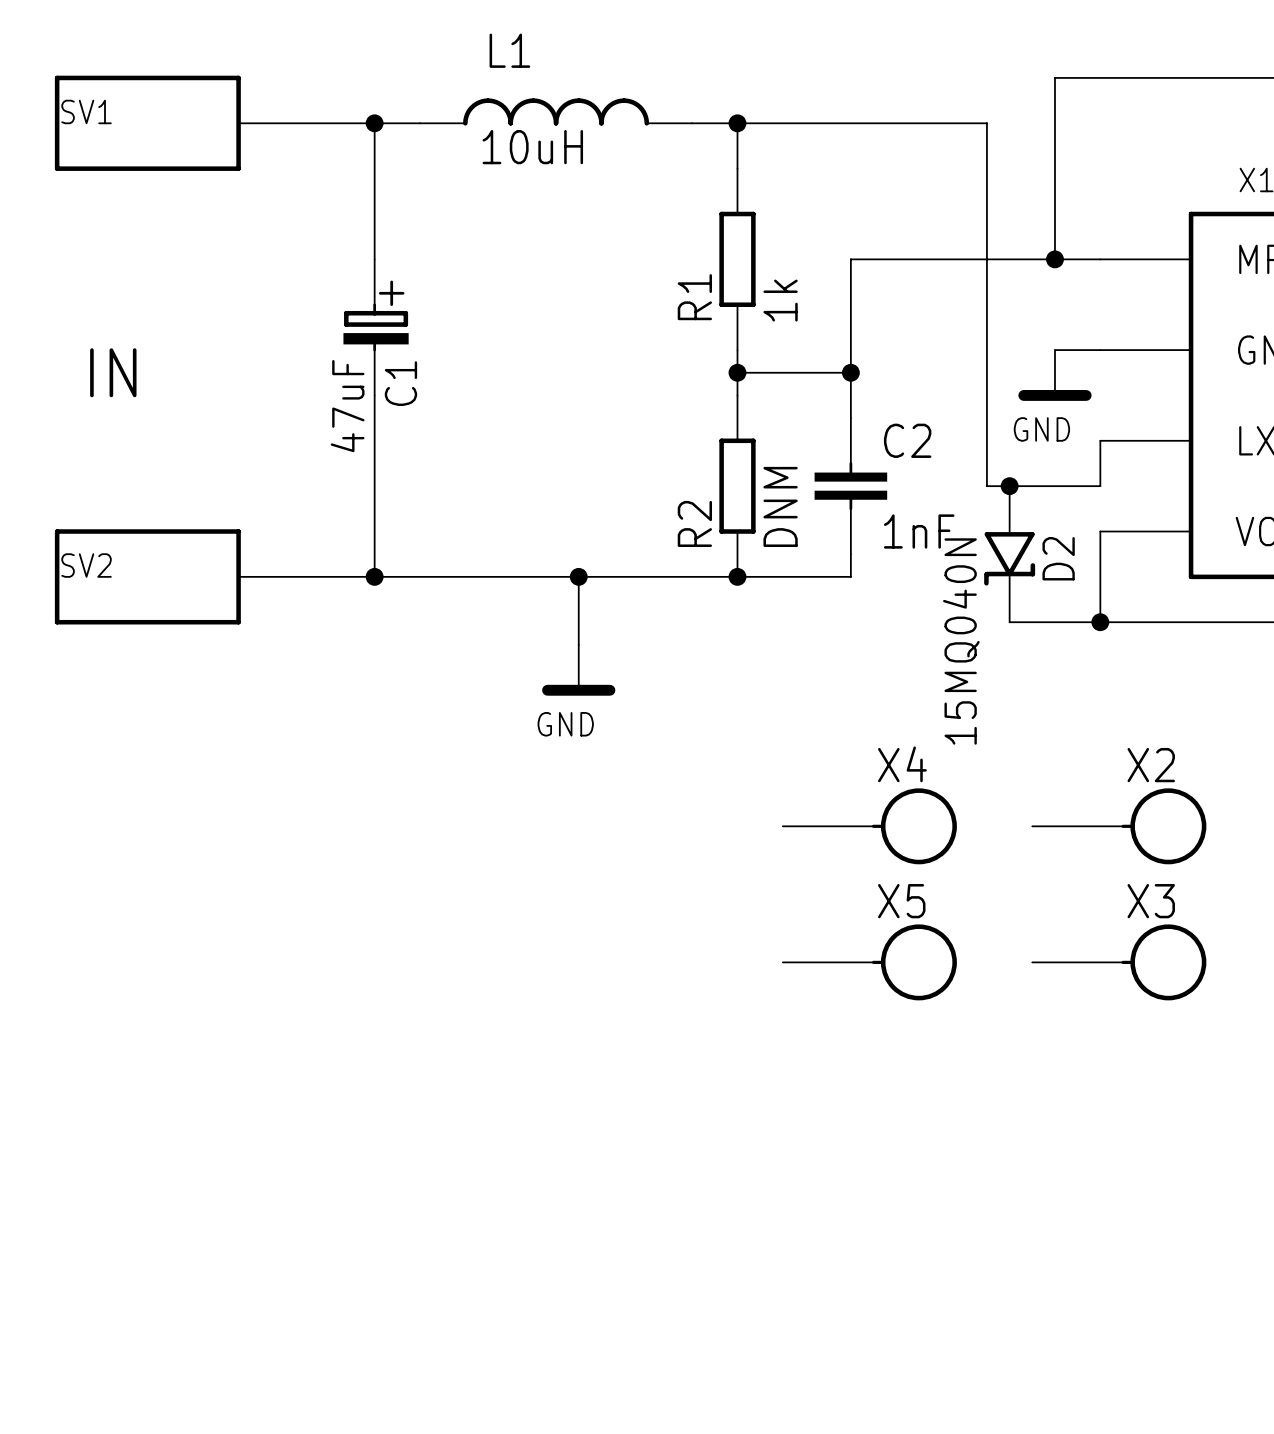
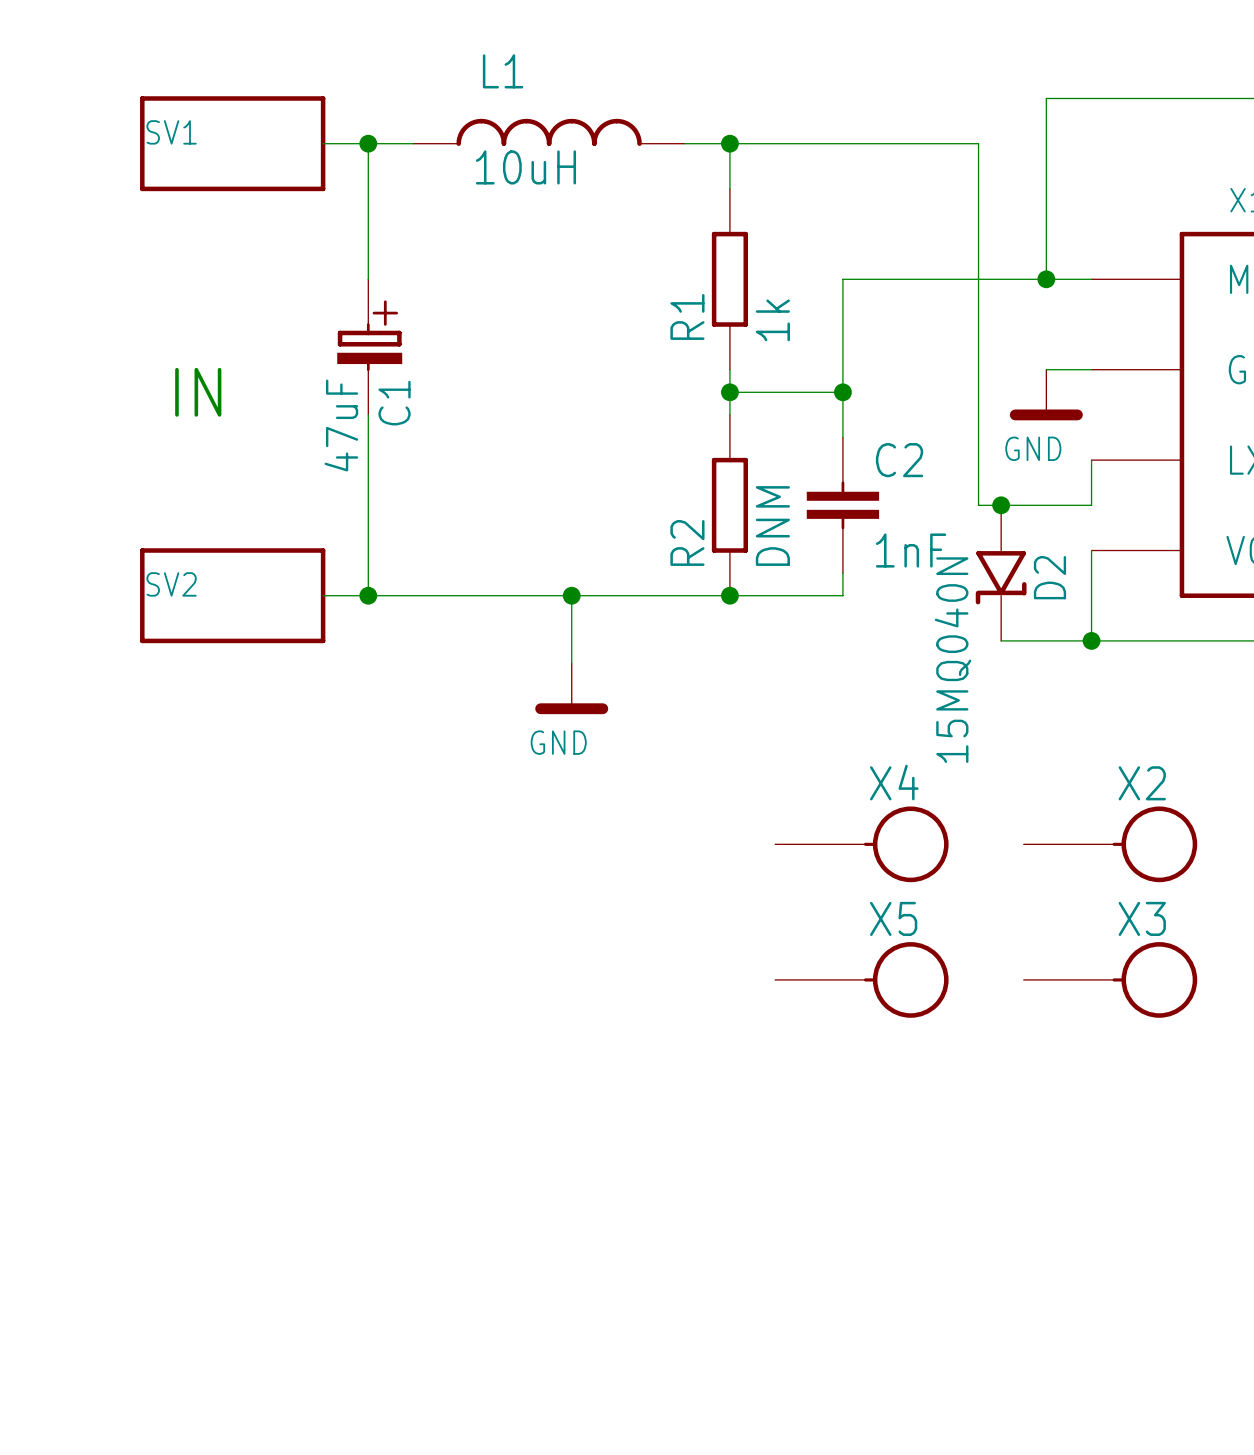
SV1 position: (147, 123) -> (232, 143)
wire: (238, 123) (329, 123) -> none
text position: IN (113, 372) -> IN (198, 392)
SV2 position: (147, 576) -> (232, 595)
wire: (238, 576) (329, 576) -> none

